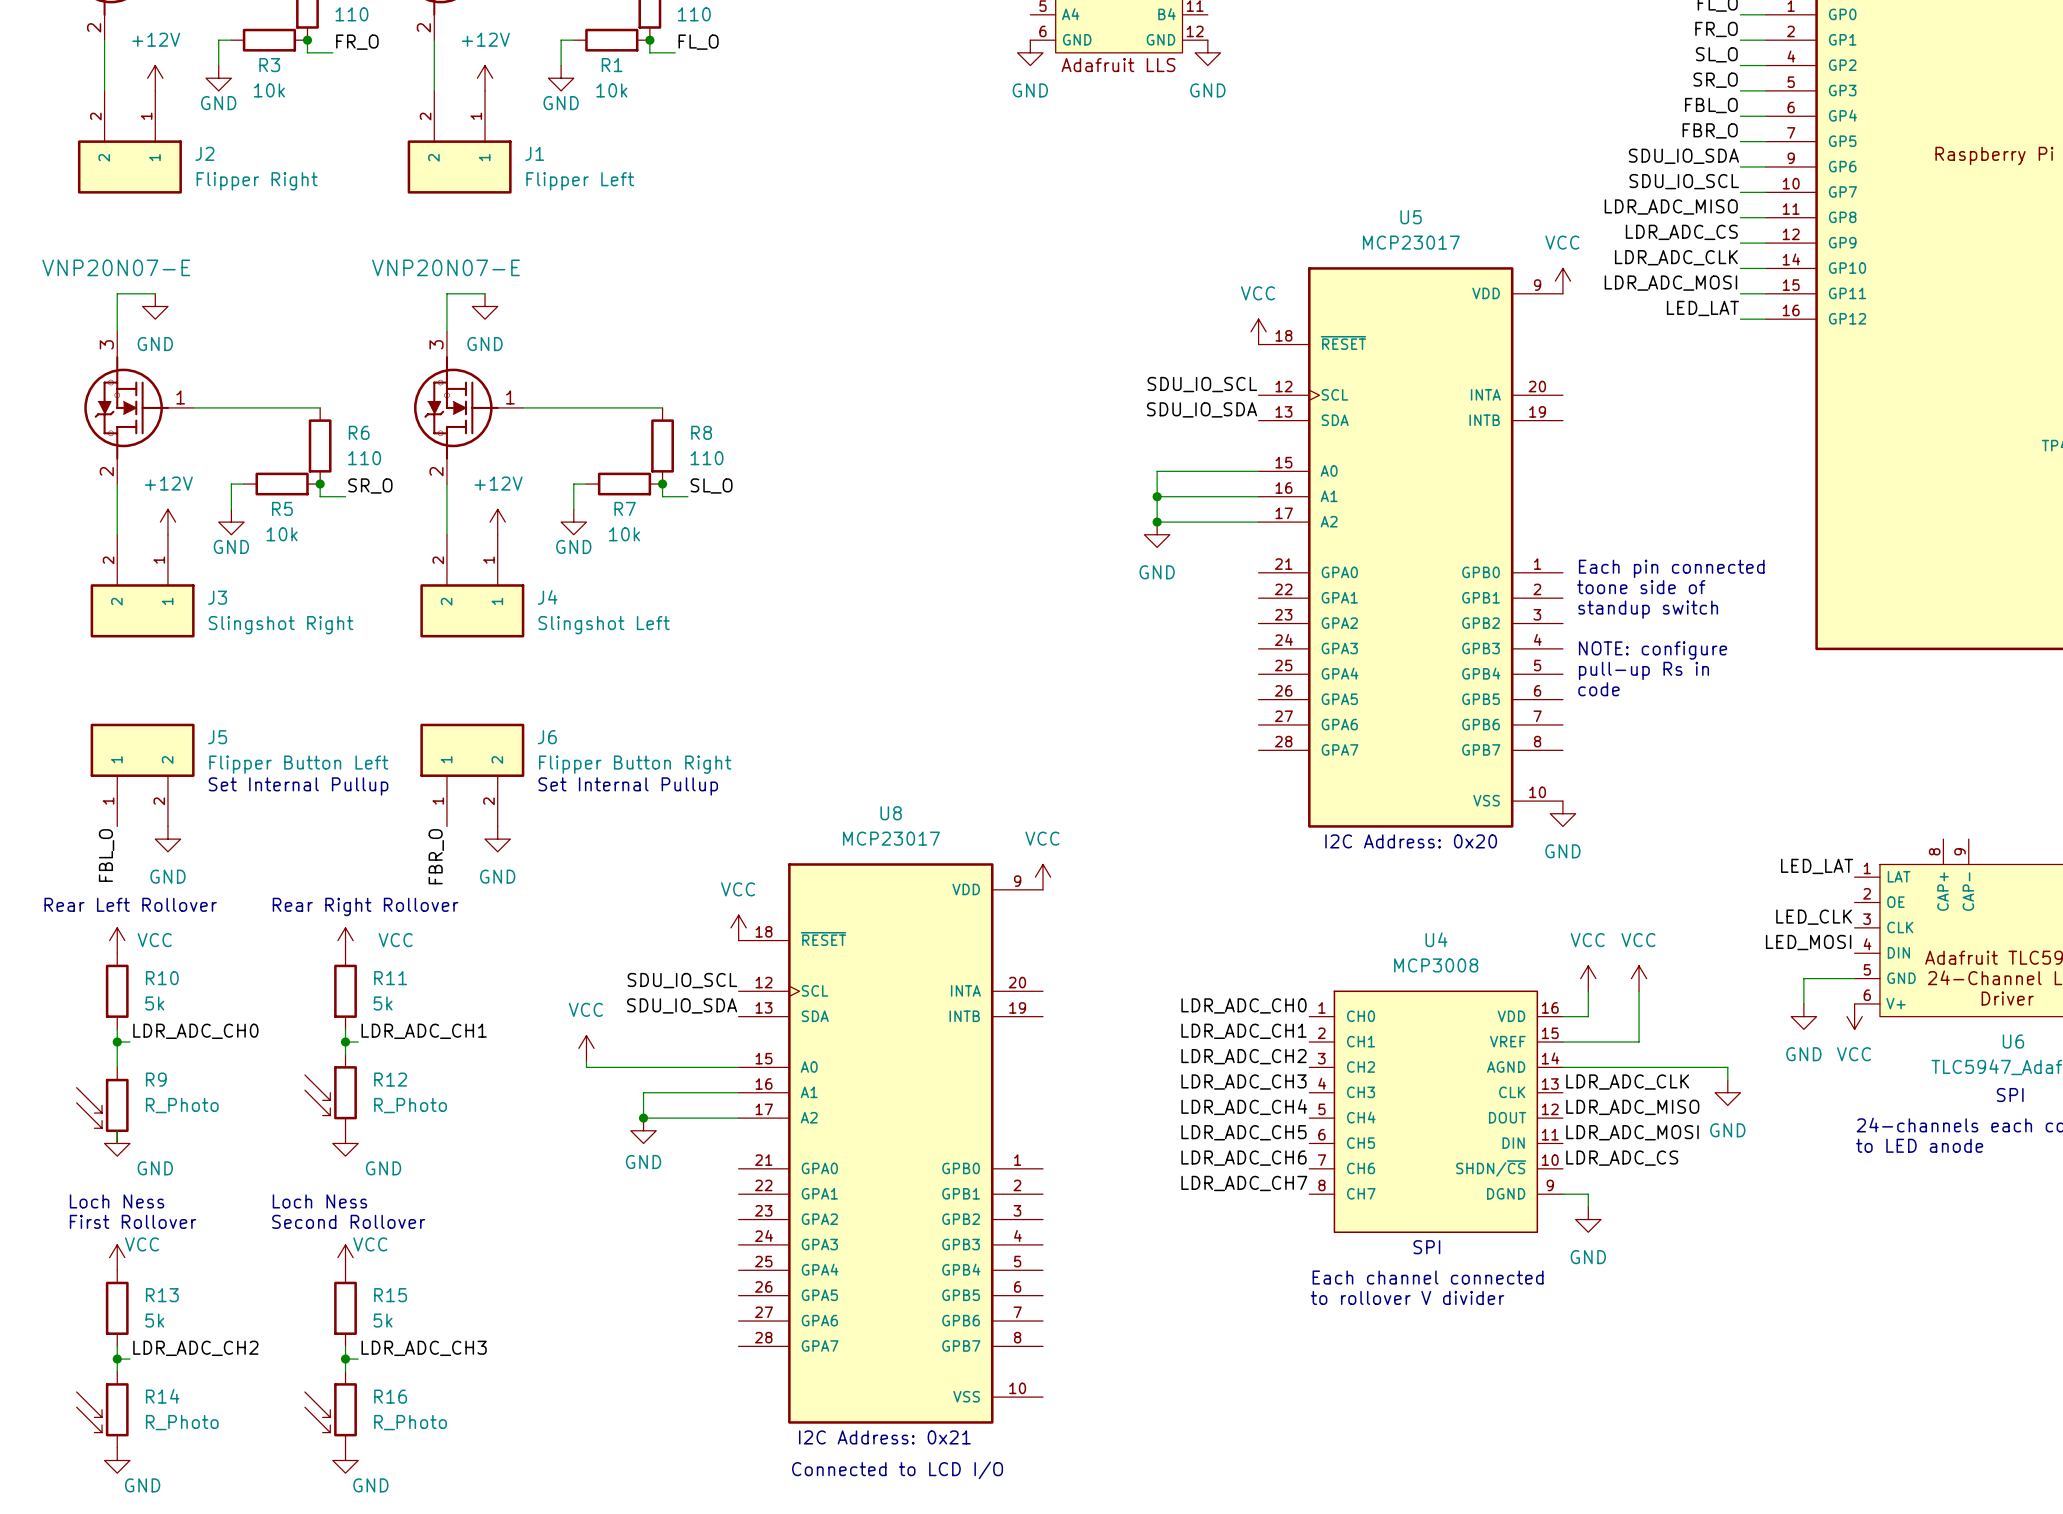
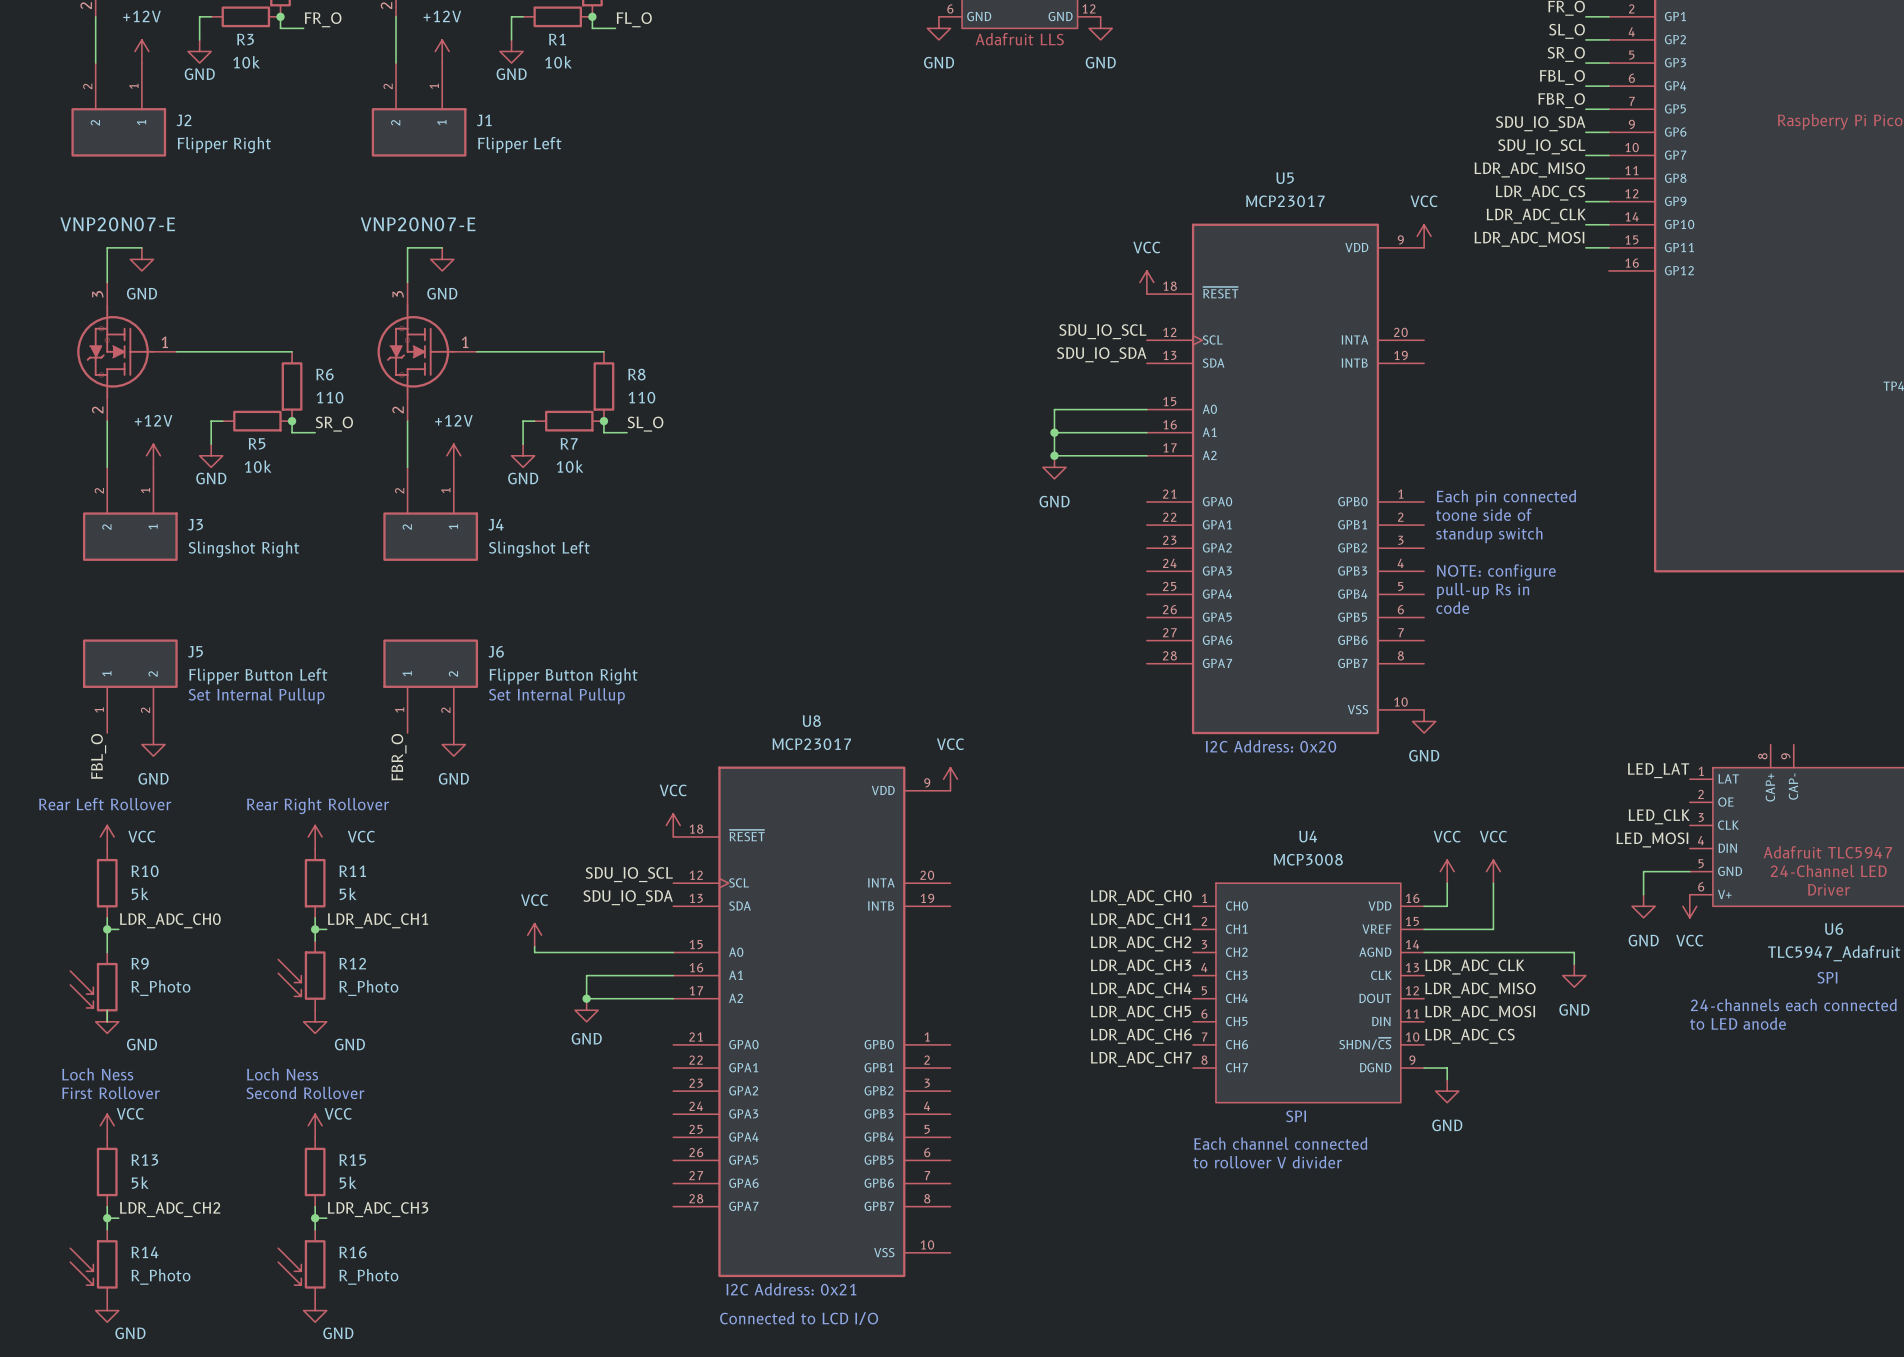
label: LED_LAT (1702, 308) -> none
wire: (1740, 319) (1765, 319) -> none

